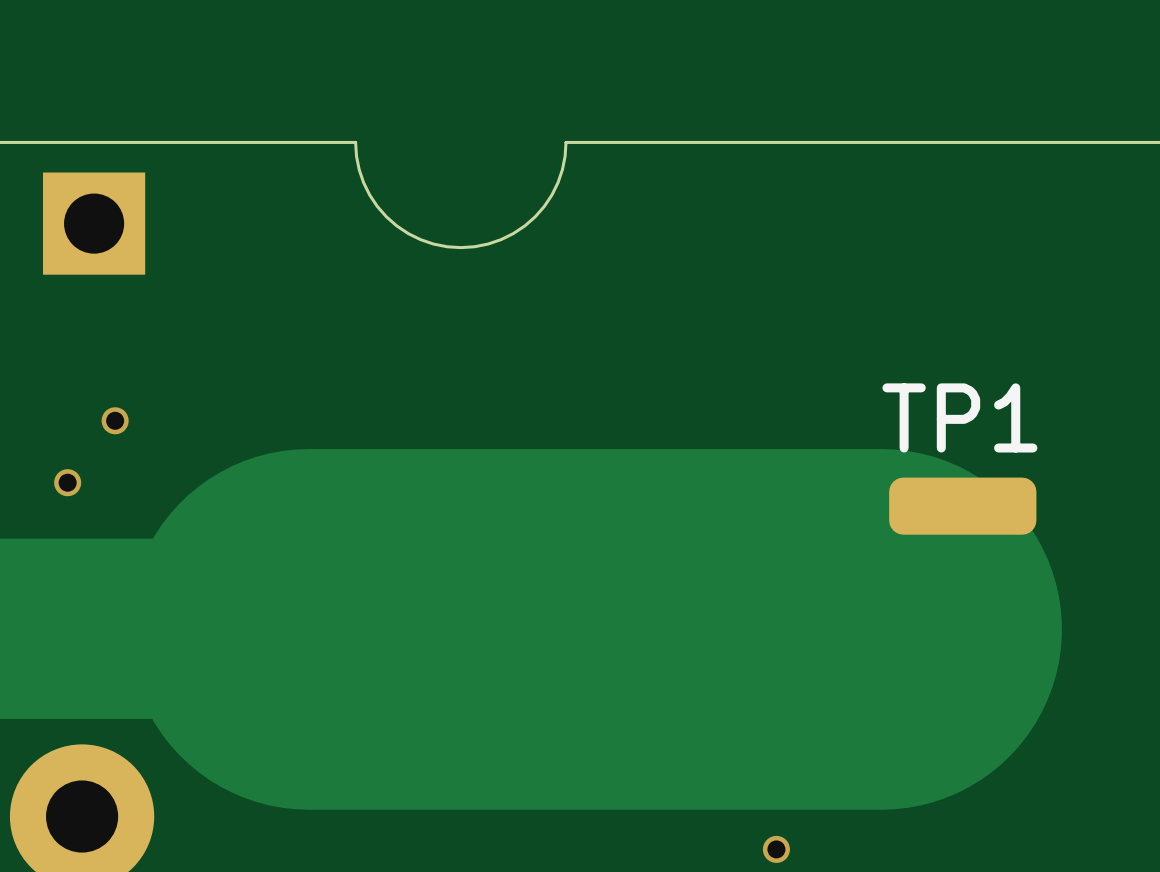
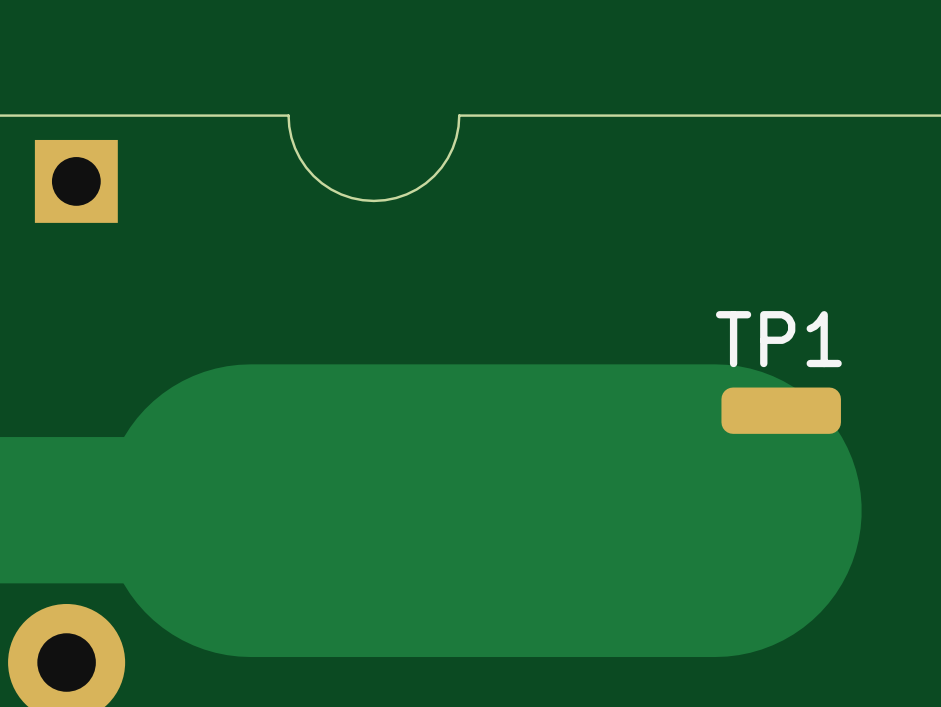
via: (115, 420) -> none
via: (67, 482) -> none
via: (776, 849) -> none

